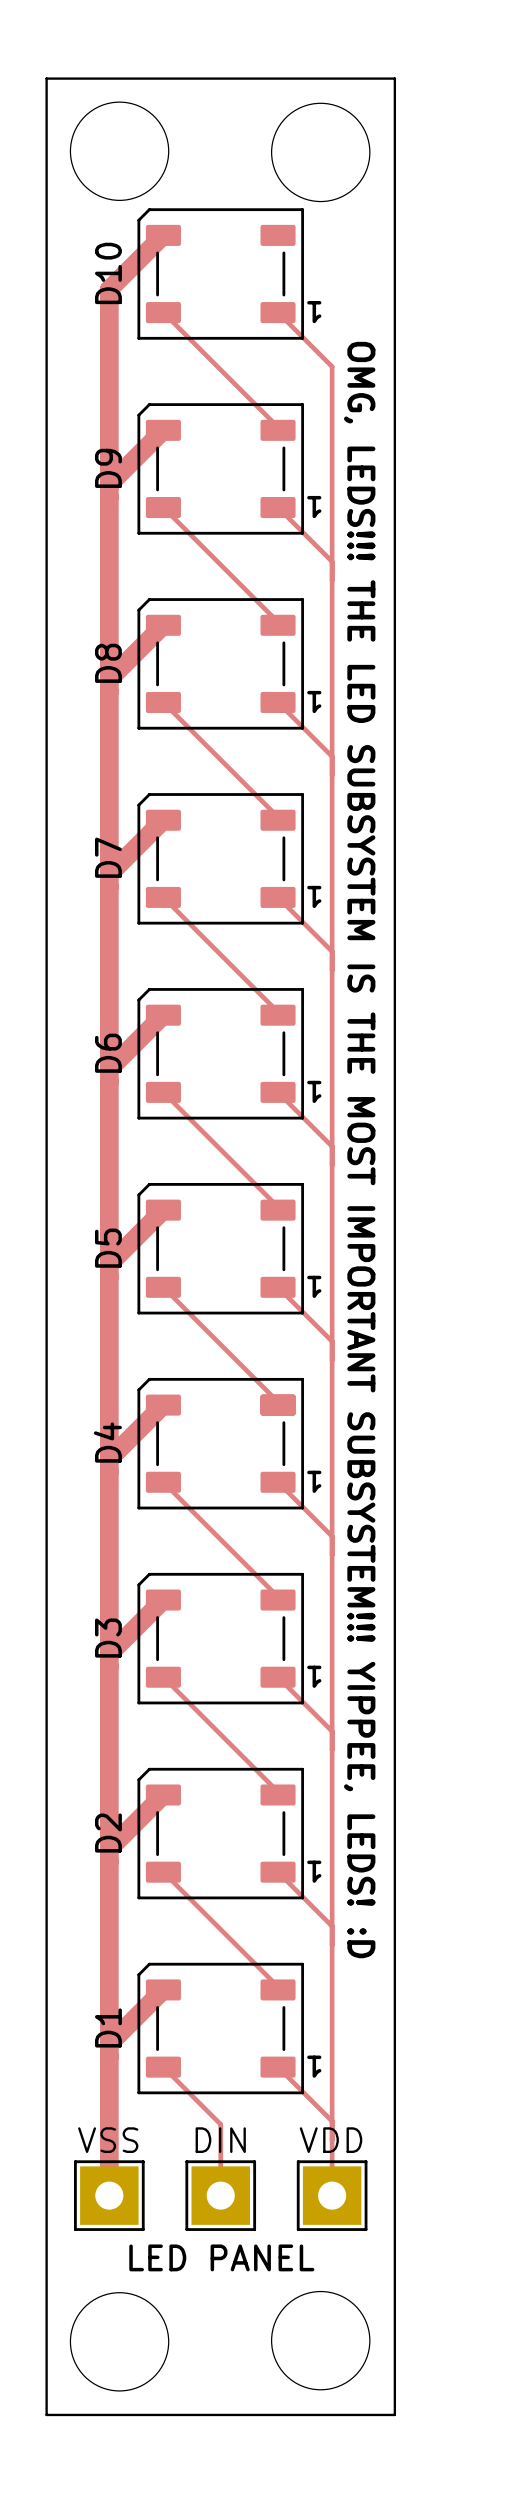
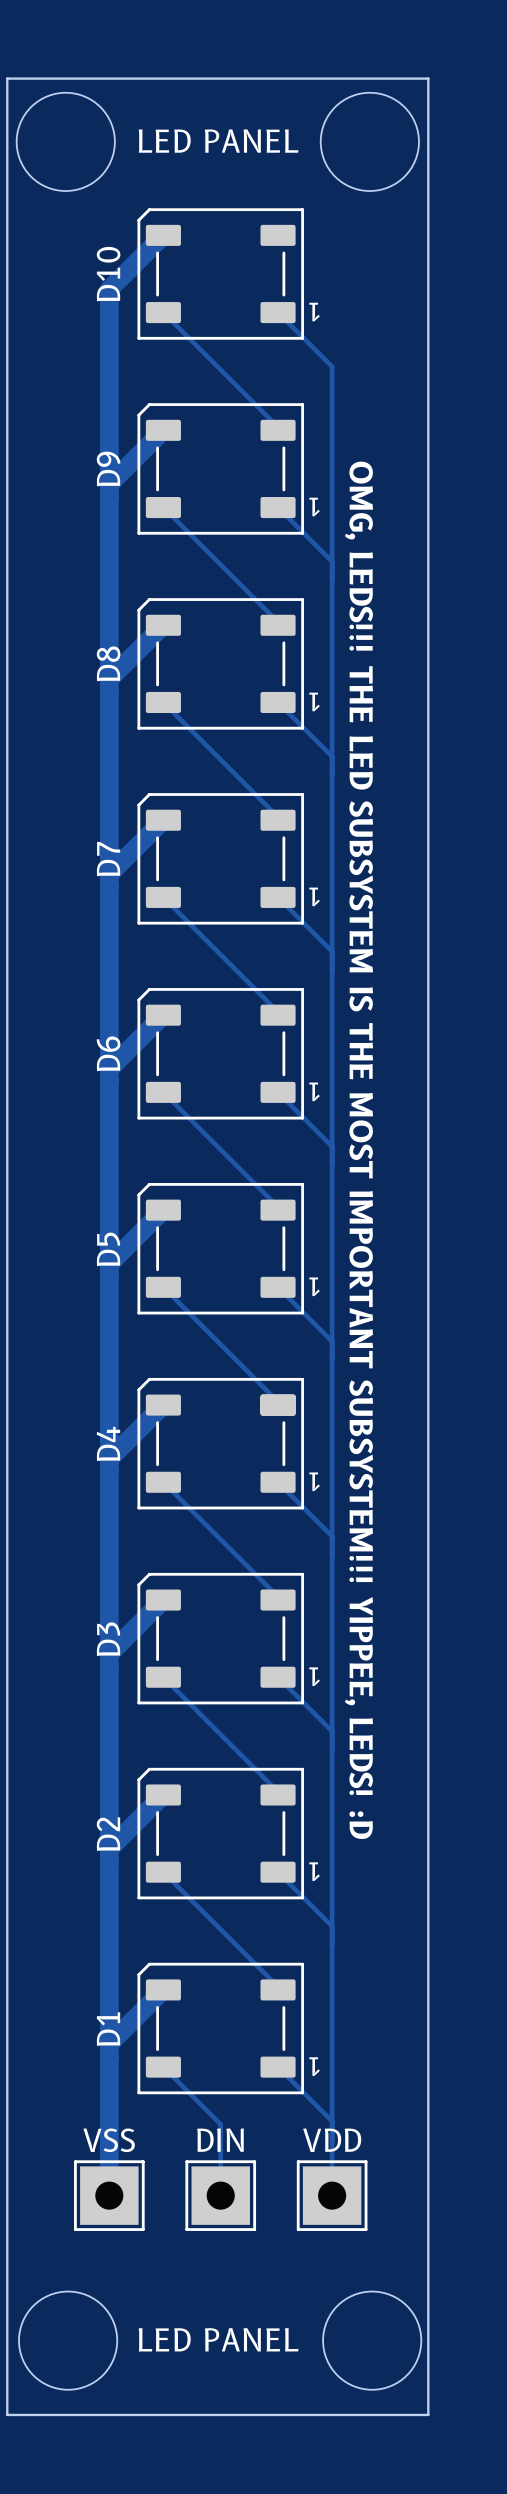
board edge: (46, 78) (46, 2414) -> (46, 78) (7, 78) (7, 2414) (46, 2414)
board edge: (394, 78) (394, 2414) -> (394, 78) (428, 78) (428, 2414) (394, 2414)
text: none -> LED PANEL (218, 141)
round board edge position: (119, 151) -> (65, 141)
round board edge position: (320, 152) -> (369, 141)
text position: LED PANEL (221, 2257) -> LED PANEL (218, 2339)
round board edge position: (320, 2340) -> (372, 2340)
round board edge position: (119, 2341) -> (68, 2340)

